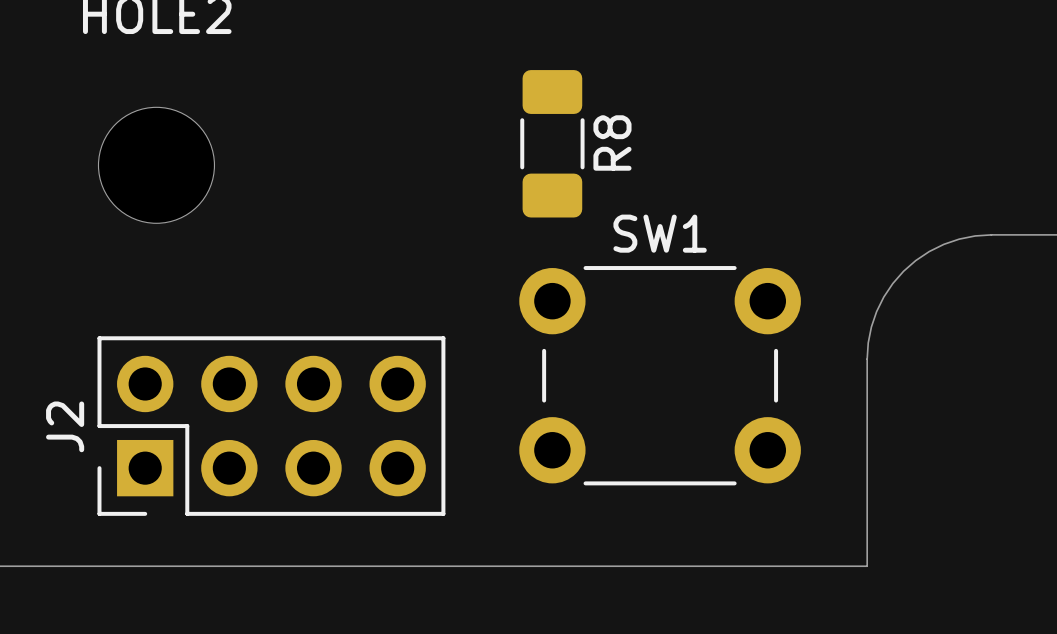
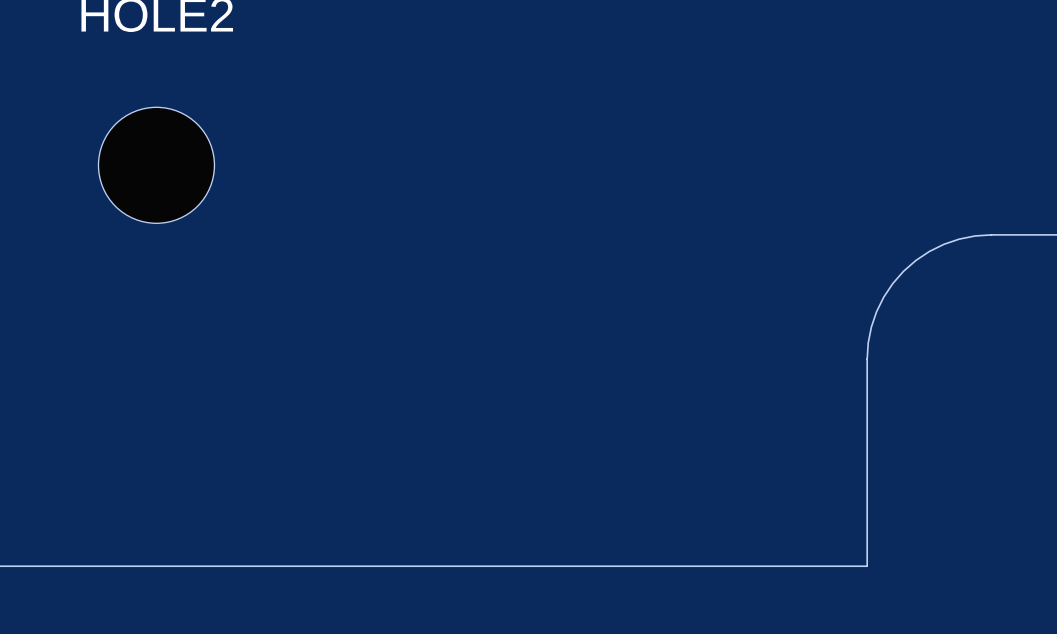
R8: (552, 143) -> none
SW1: (660, 375) -> none
J2: (271, 426) -> none

